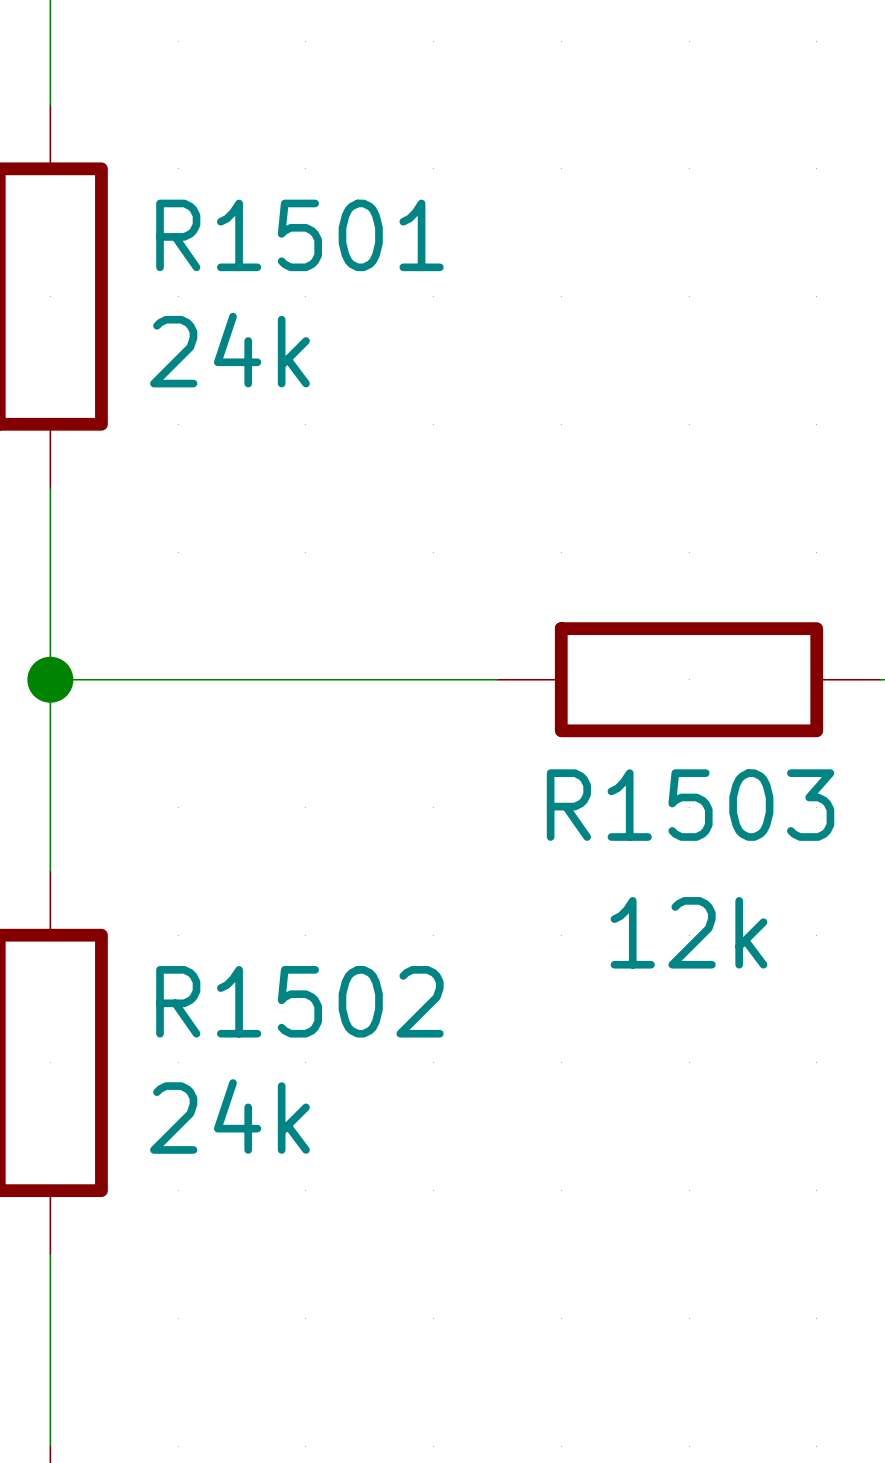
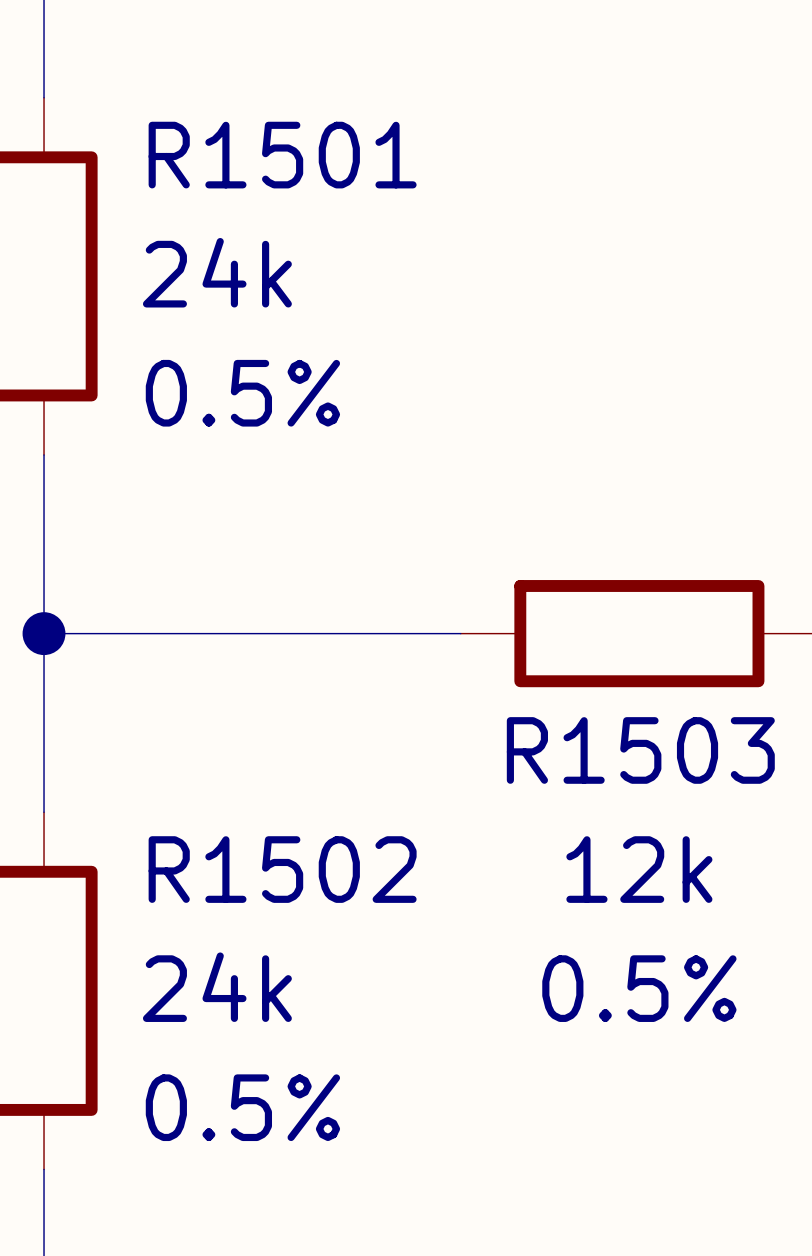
R1501 name position: R1501 (299, 235) -> R1501 (282, 155)
R1501 value position: 24k (229, 350) -> 24k (217, 272)
R1501 text: none -> 0.5% (242, 393)
R1502 name position: R1502 (299, 1001) -> R1502 (282, 869)
R1503 text: none -> 0.5% (639, 988)
R1502 value position: 24k (229, 1116) -> 24k (217, 987)
R1502 text: none -> 0.5% (242, 1107)

